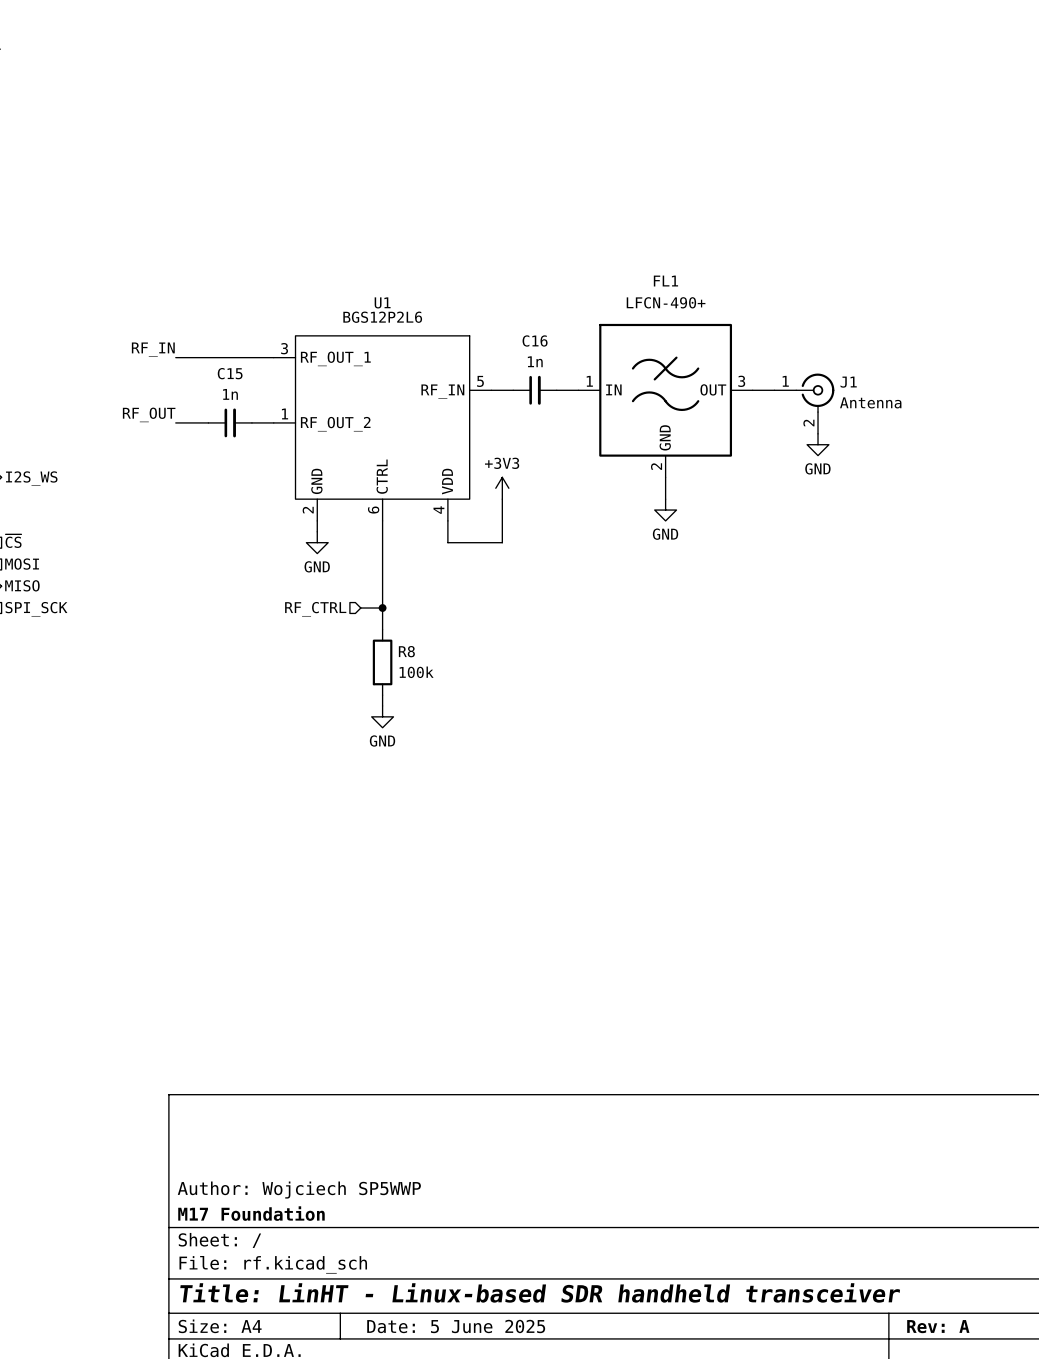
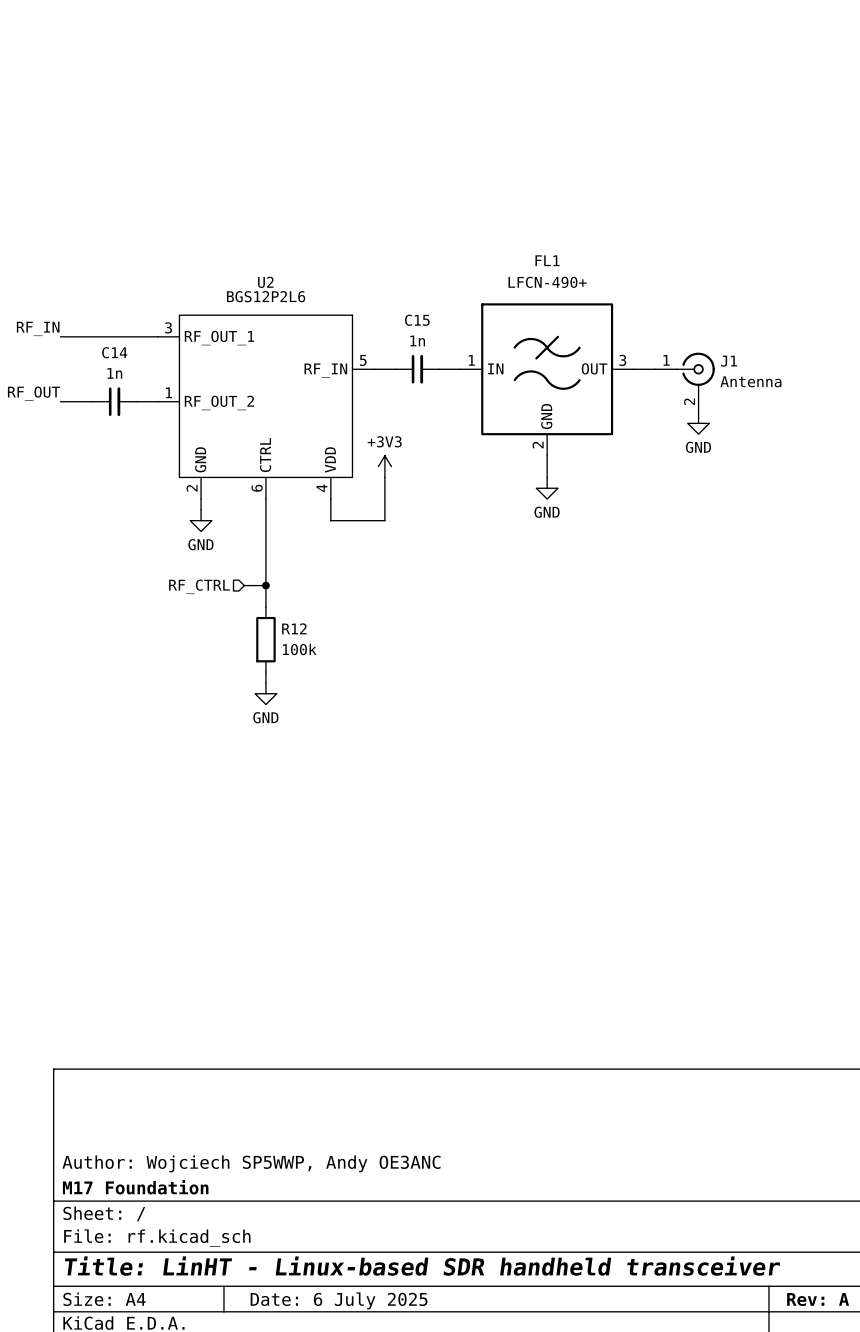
U1 name: U1 (382, 302) -> U2 (265, 282)
C16 name: C16 (535, 340) -> C15 (417, 320)
C15 name: C15 (230, 373) -> C14 (114, 352)
R8 name: R8 (406, 651) -> R12 (294, 628)
title block: Author: Wojciech SP5WWP (299, 1190) -> Author: Wojciech SP5WWP, Andy OE3ANC (251, 1163)
title block: Date: 5 June 2025 (456, 1326) -> Date: 6 July 2025 (339, 1300)

